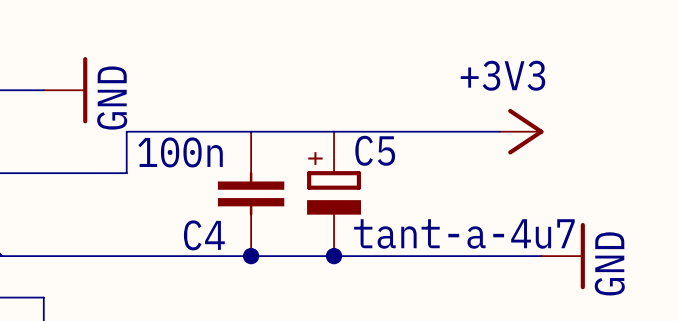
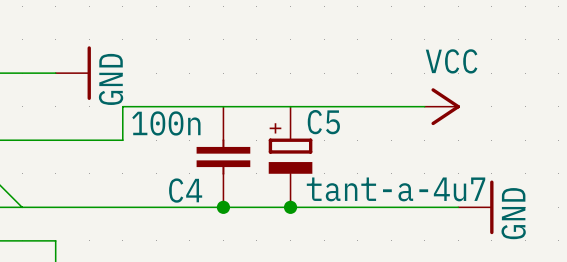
power symbol: +3V3 (521, 131) -> VCC (442, 106)

